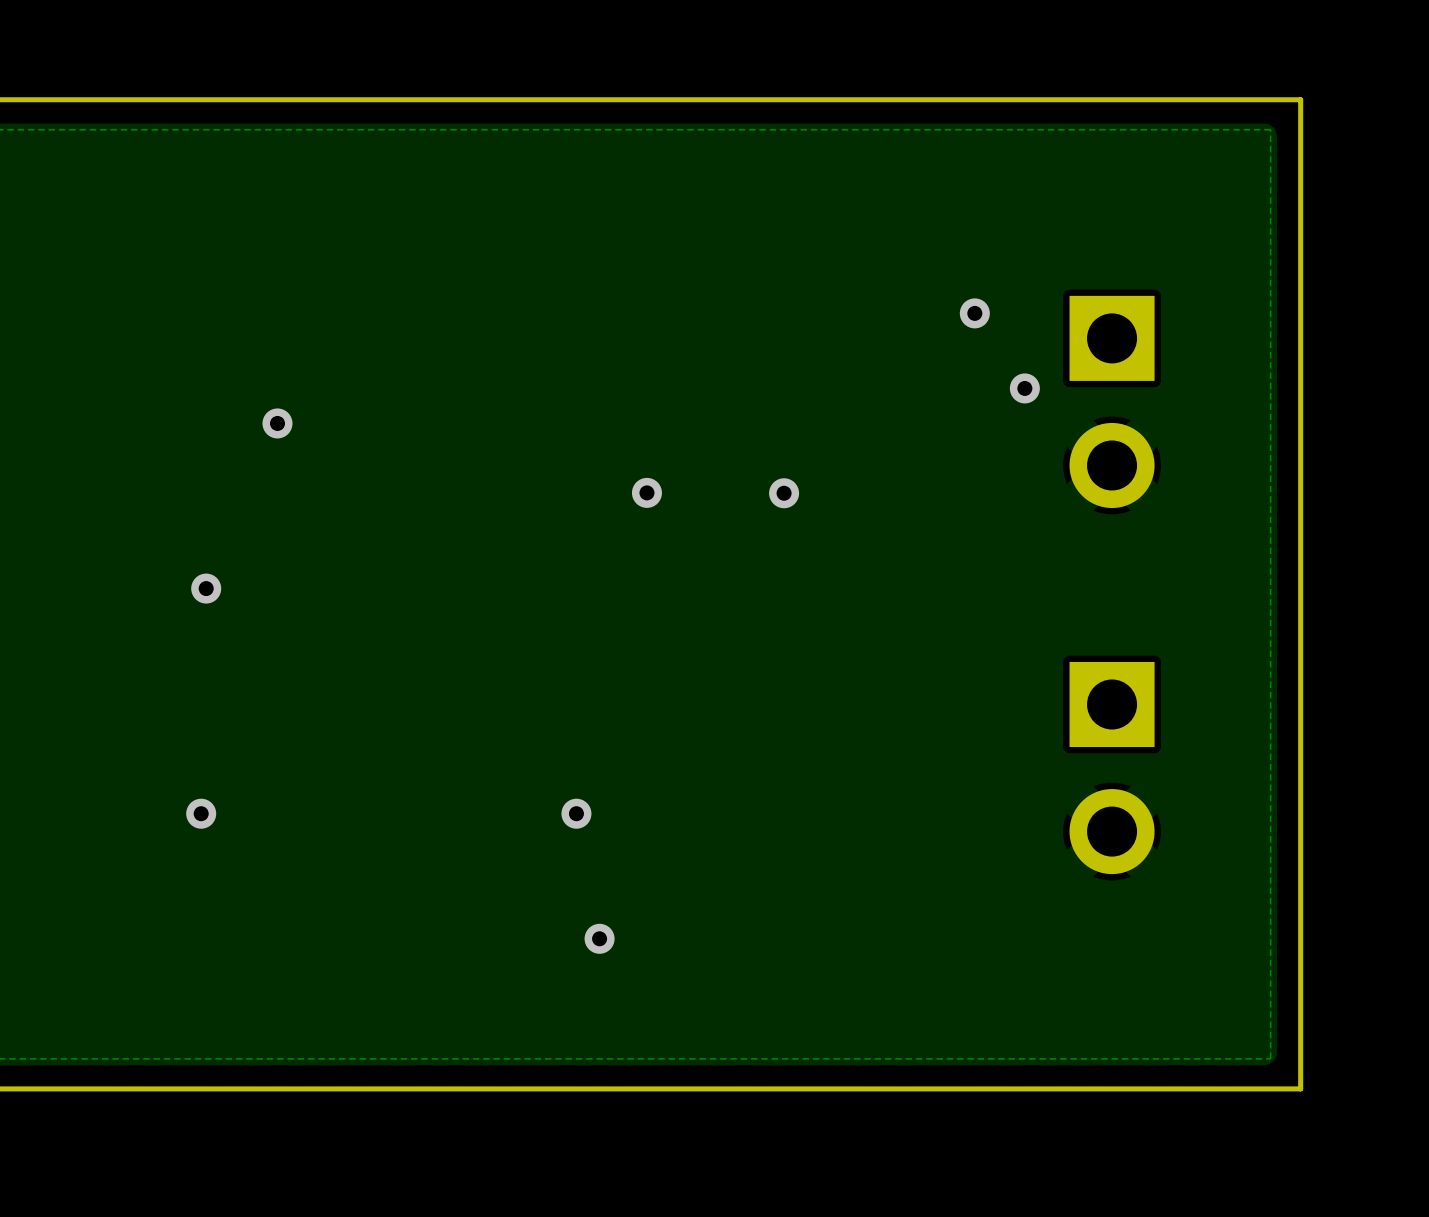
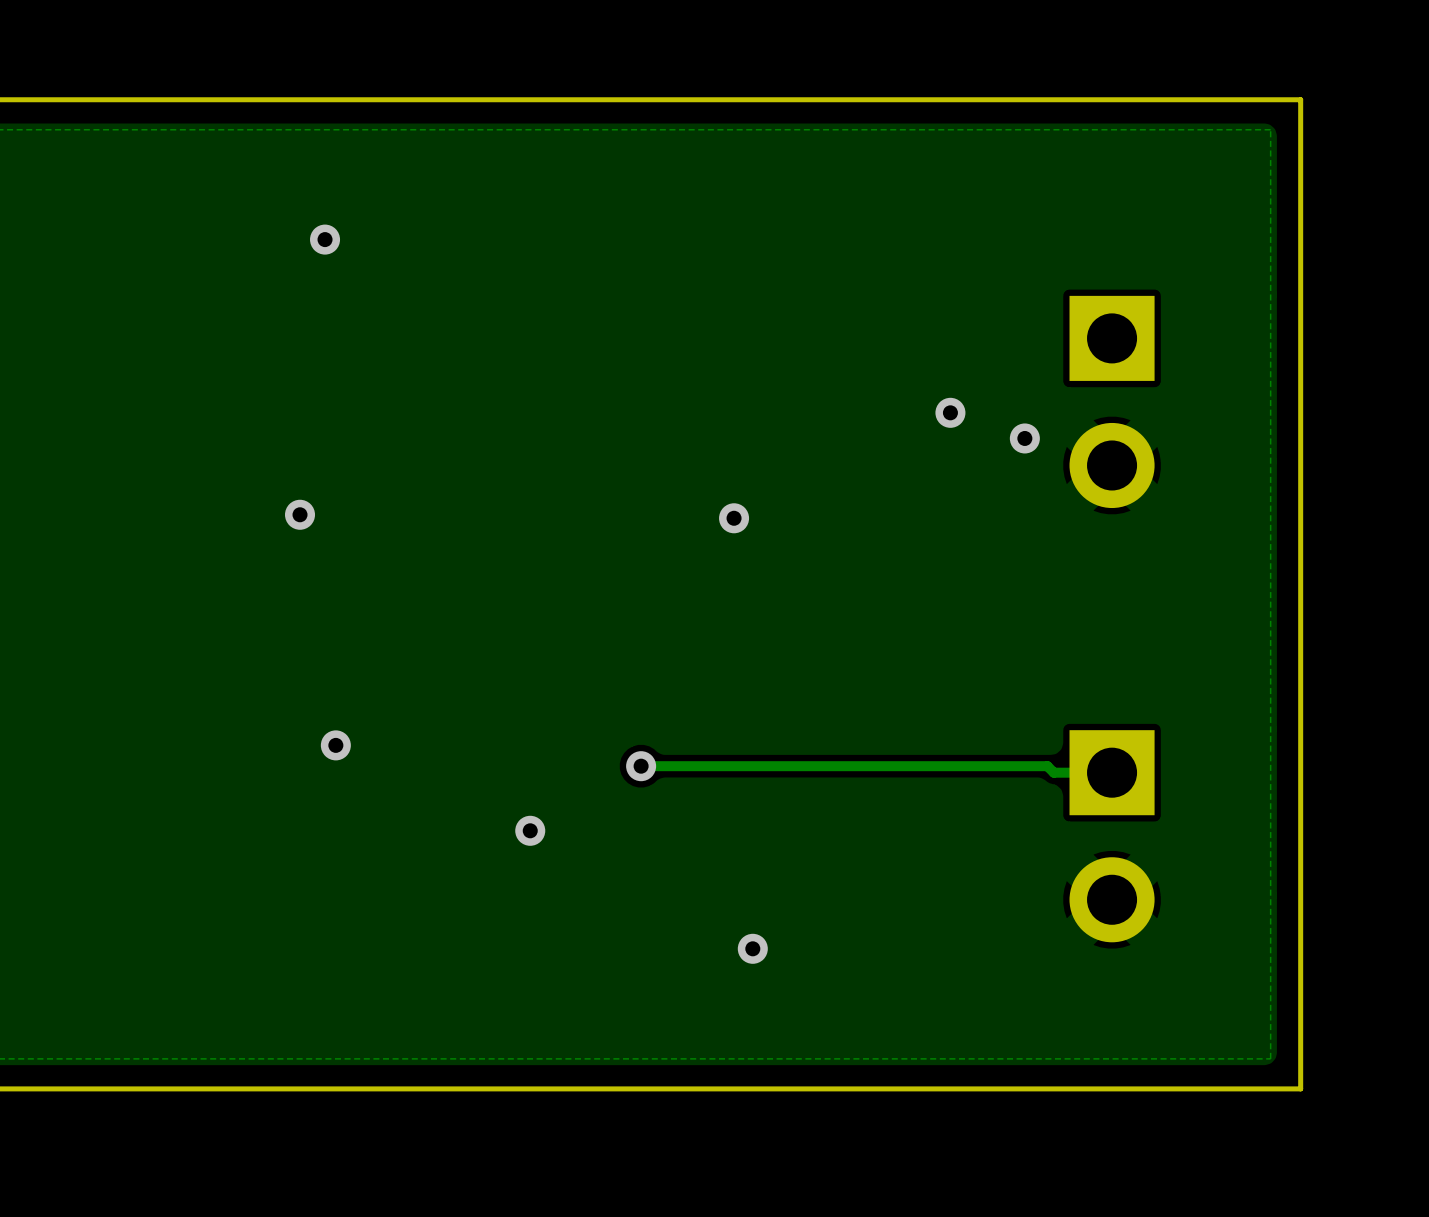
via: none -> (325, 239)
via: (974, 313) -> none
via: (1024, 388) -> none
via: none -> (950, 412)
via: (277, 423) -> none
via: none -> (1024, 438)
via: (646, 492) -> none
via: (784, 493) -> none
via: none -> (300, 514)
via: none -> (734, 518)
via: (206, 588) -> none
via: none -> (335, 745)
track: none -> (641, 766) (1047, 766) (1053, 772) (1112, 772)
via: none -> (641, 766)
part position: (1112, 768) -> (1112, 836)
via: (201, 813) -> none
via: (576, 813) -> none
via: none -> (530, 830)
via: (599, 938) -> none
via: none -> (752, 948)

